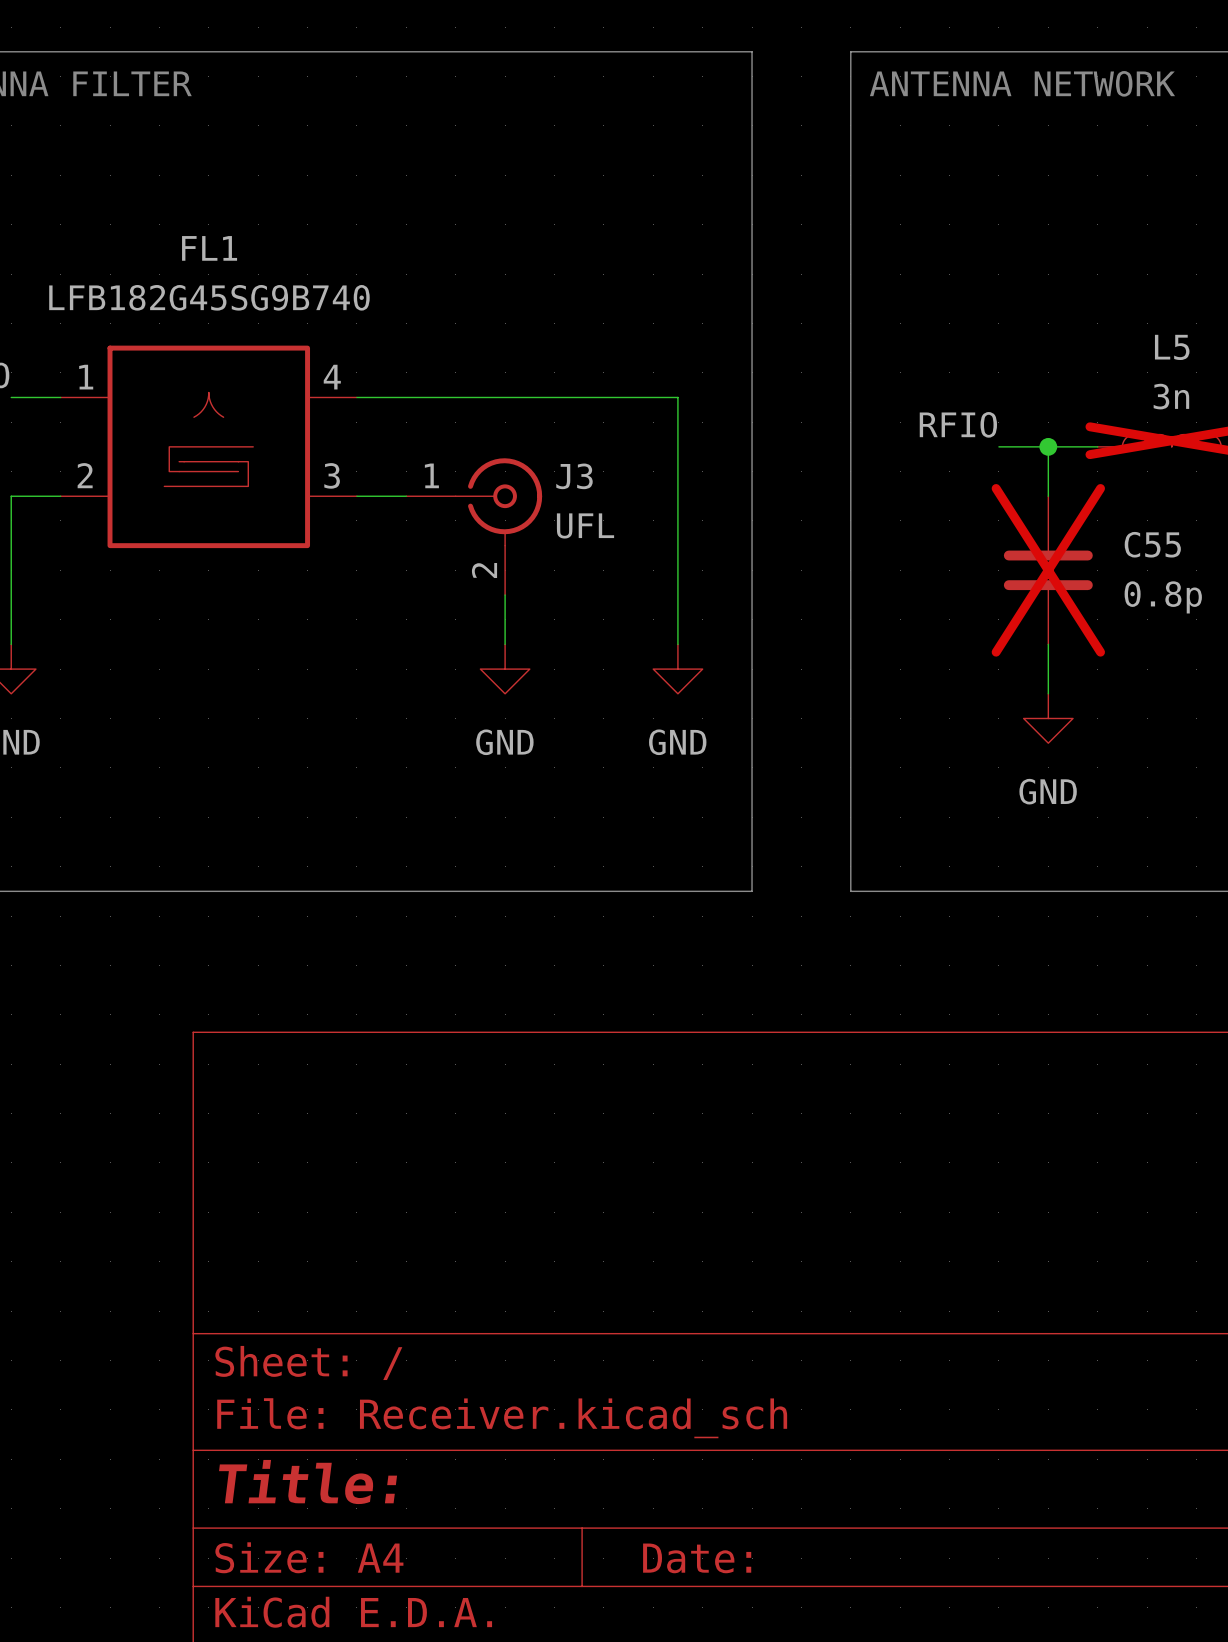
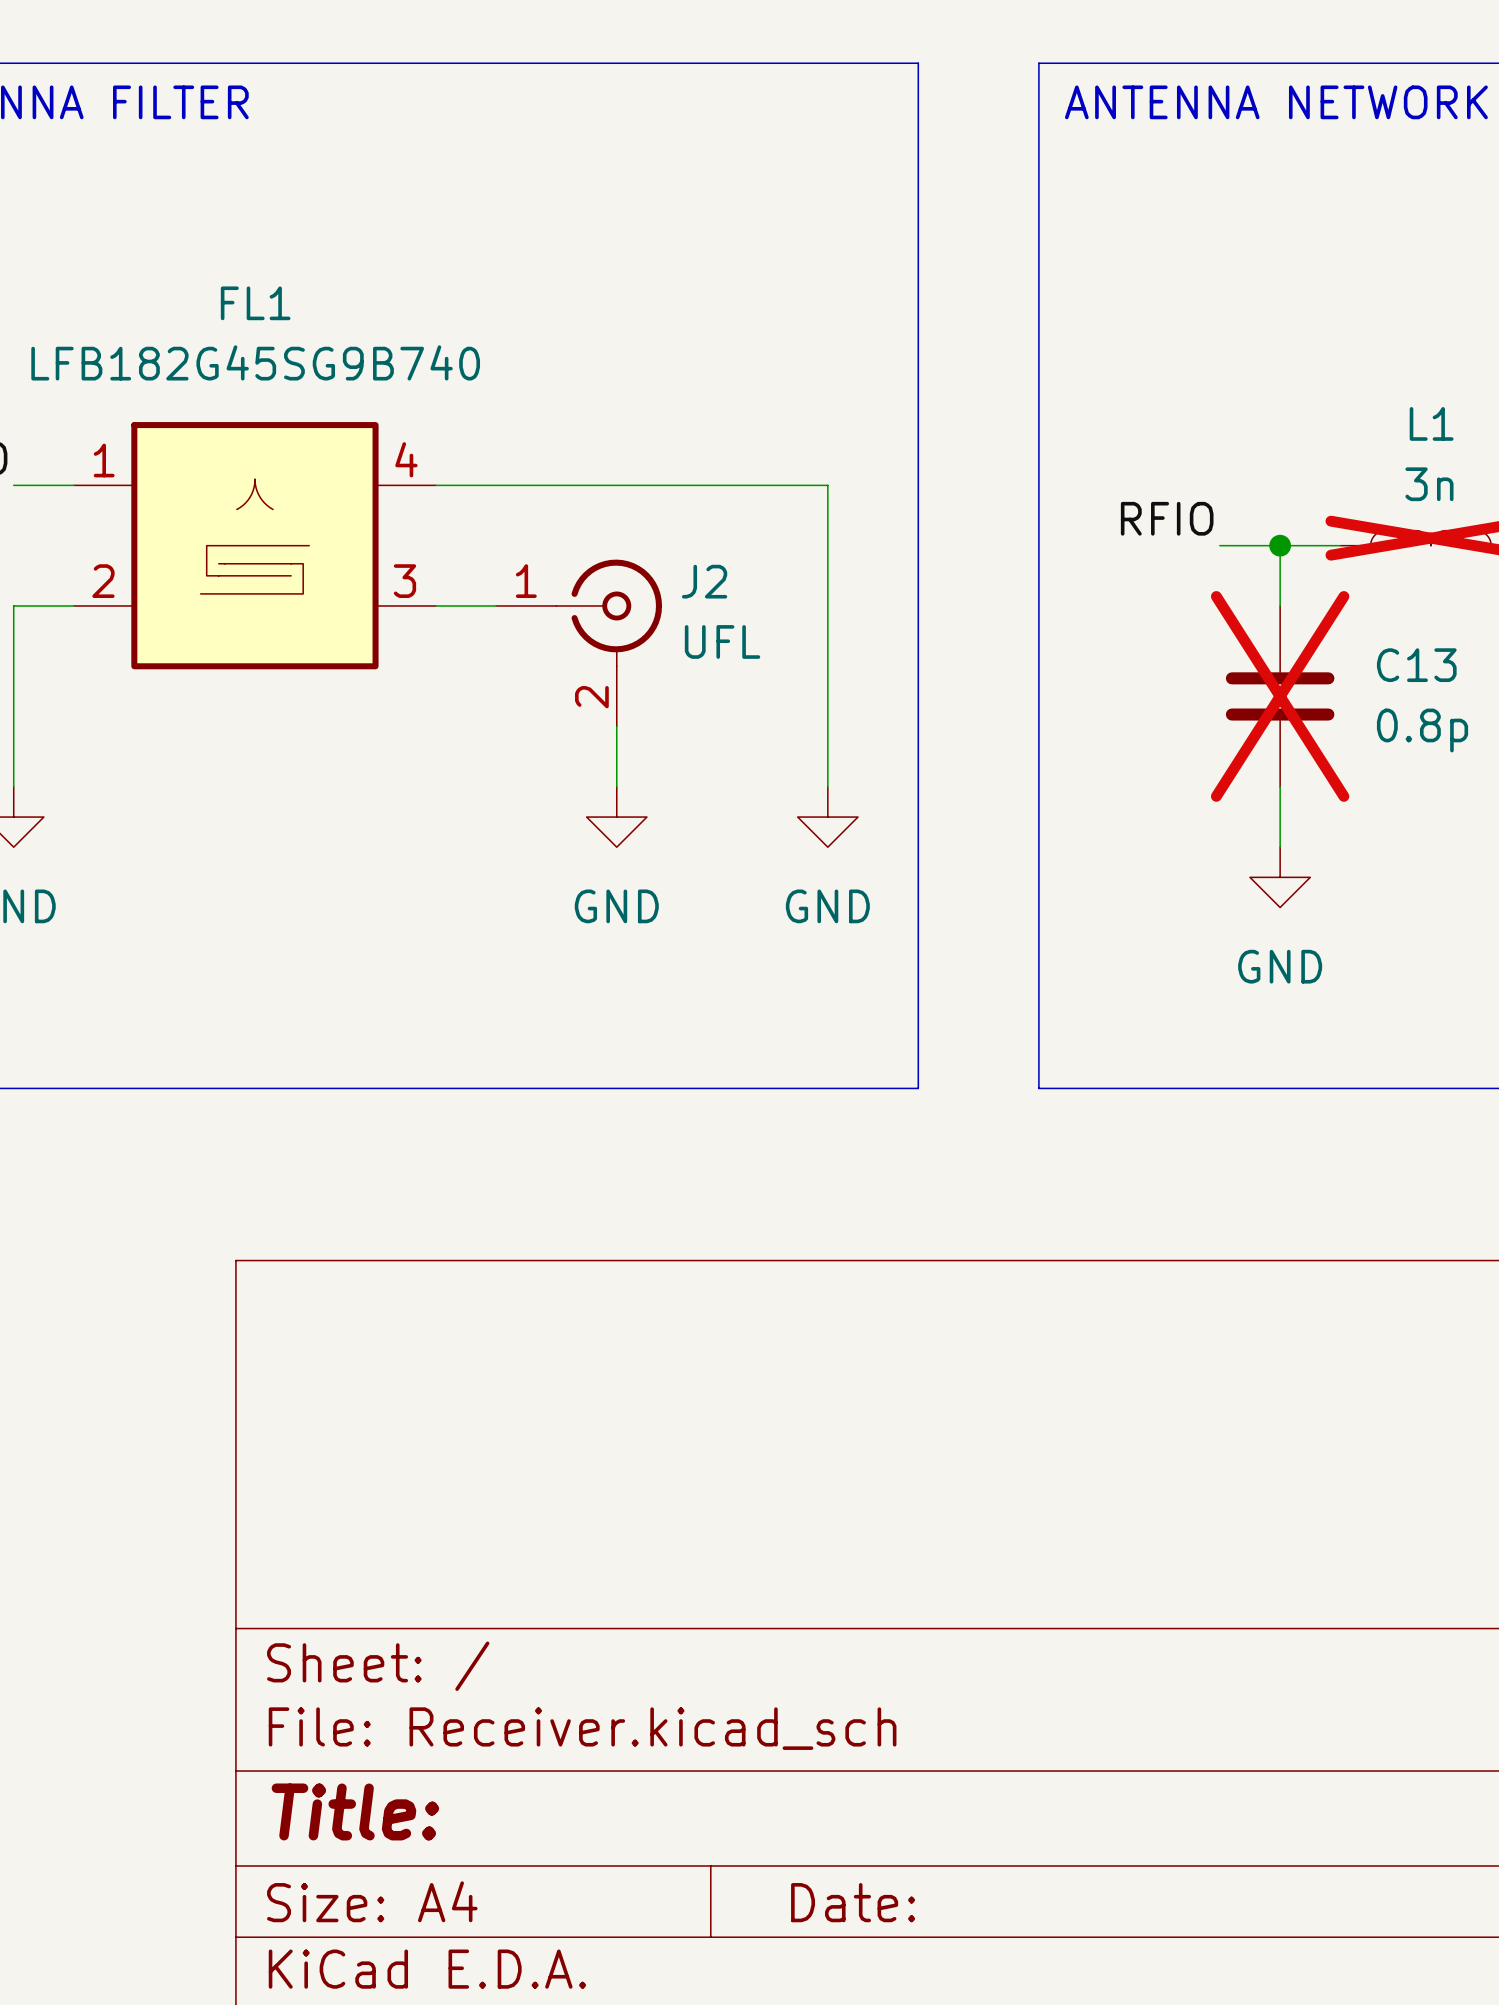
L5 name: L5 (1172, 347) -> L1 (1431, 423)
J3 name: J3 (574, 476) -> J2 (704, 581)
C55 name: C55 (1152, 544) -> C13 (1416, 665)

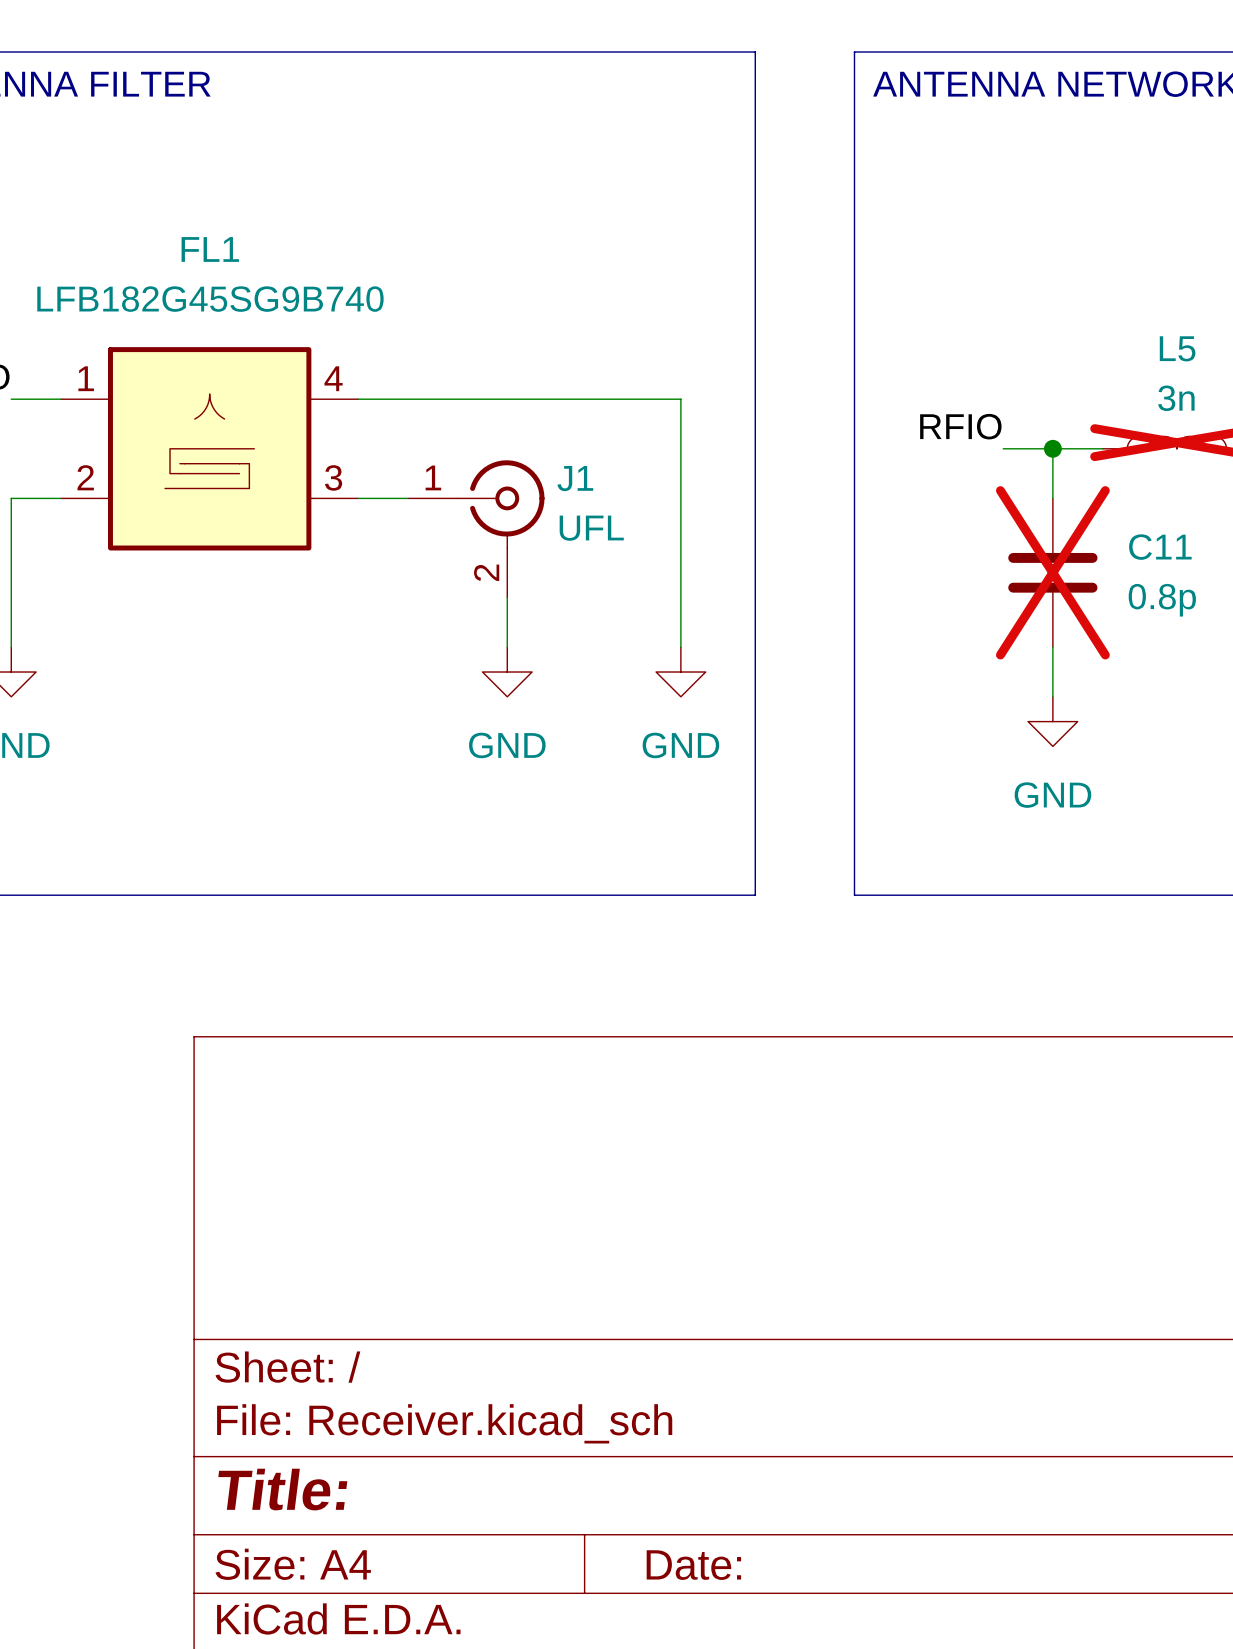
L1 name: L1 (1431, 423) -> L5 (1177, 348)
J2 name: J2 (704, 581) -> J1 (575, 478)
C13 name: C13 (1416, 665) -> C11 (1160, 547)

